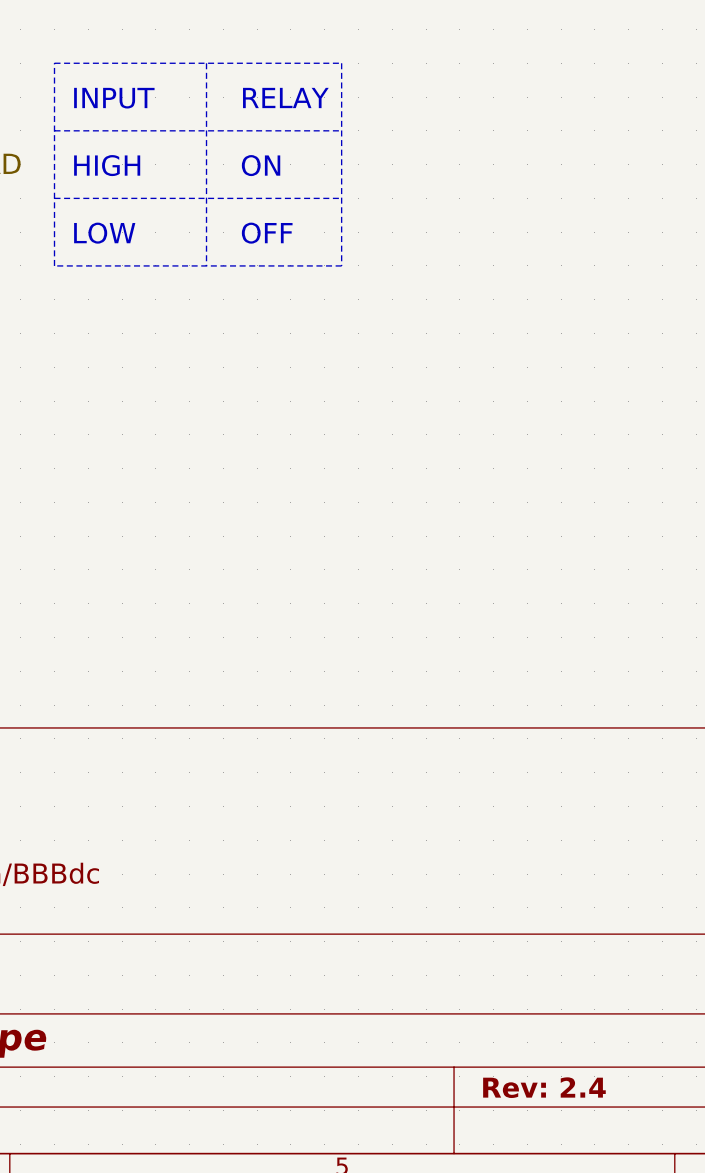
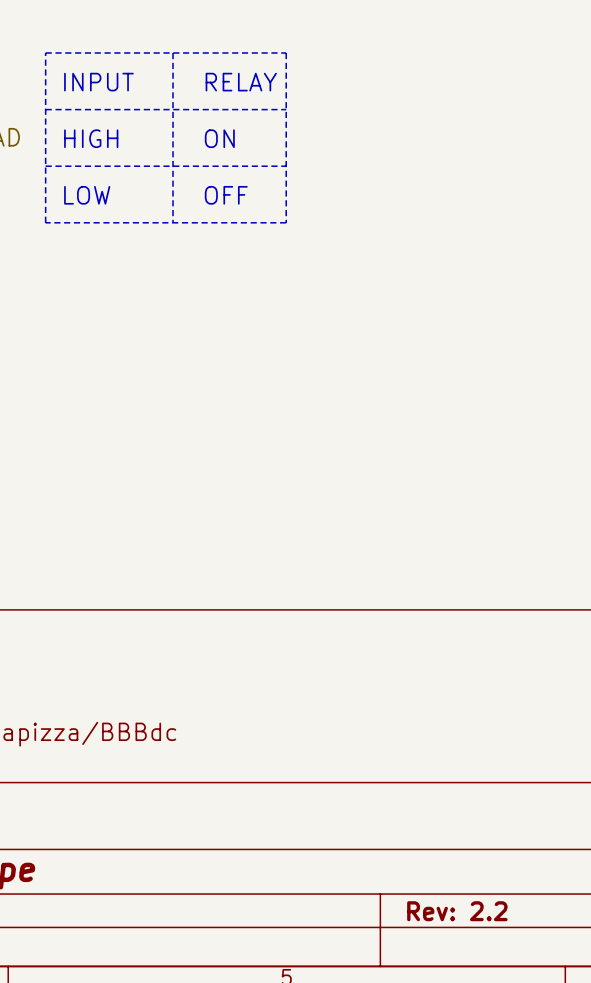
title block: Rev: 2.4 (544, 1087) -> Rev: 2.2 (457, 911)

